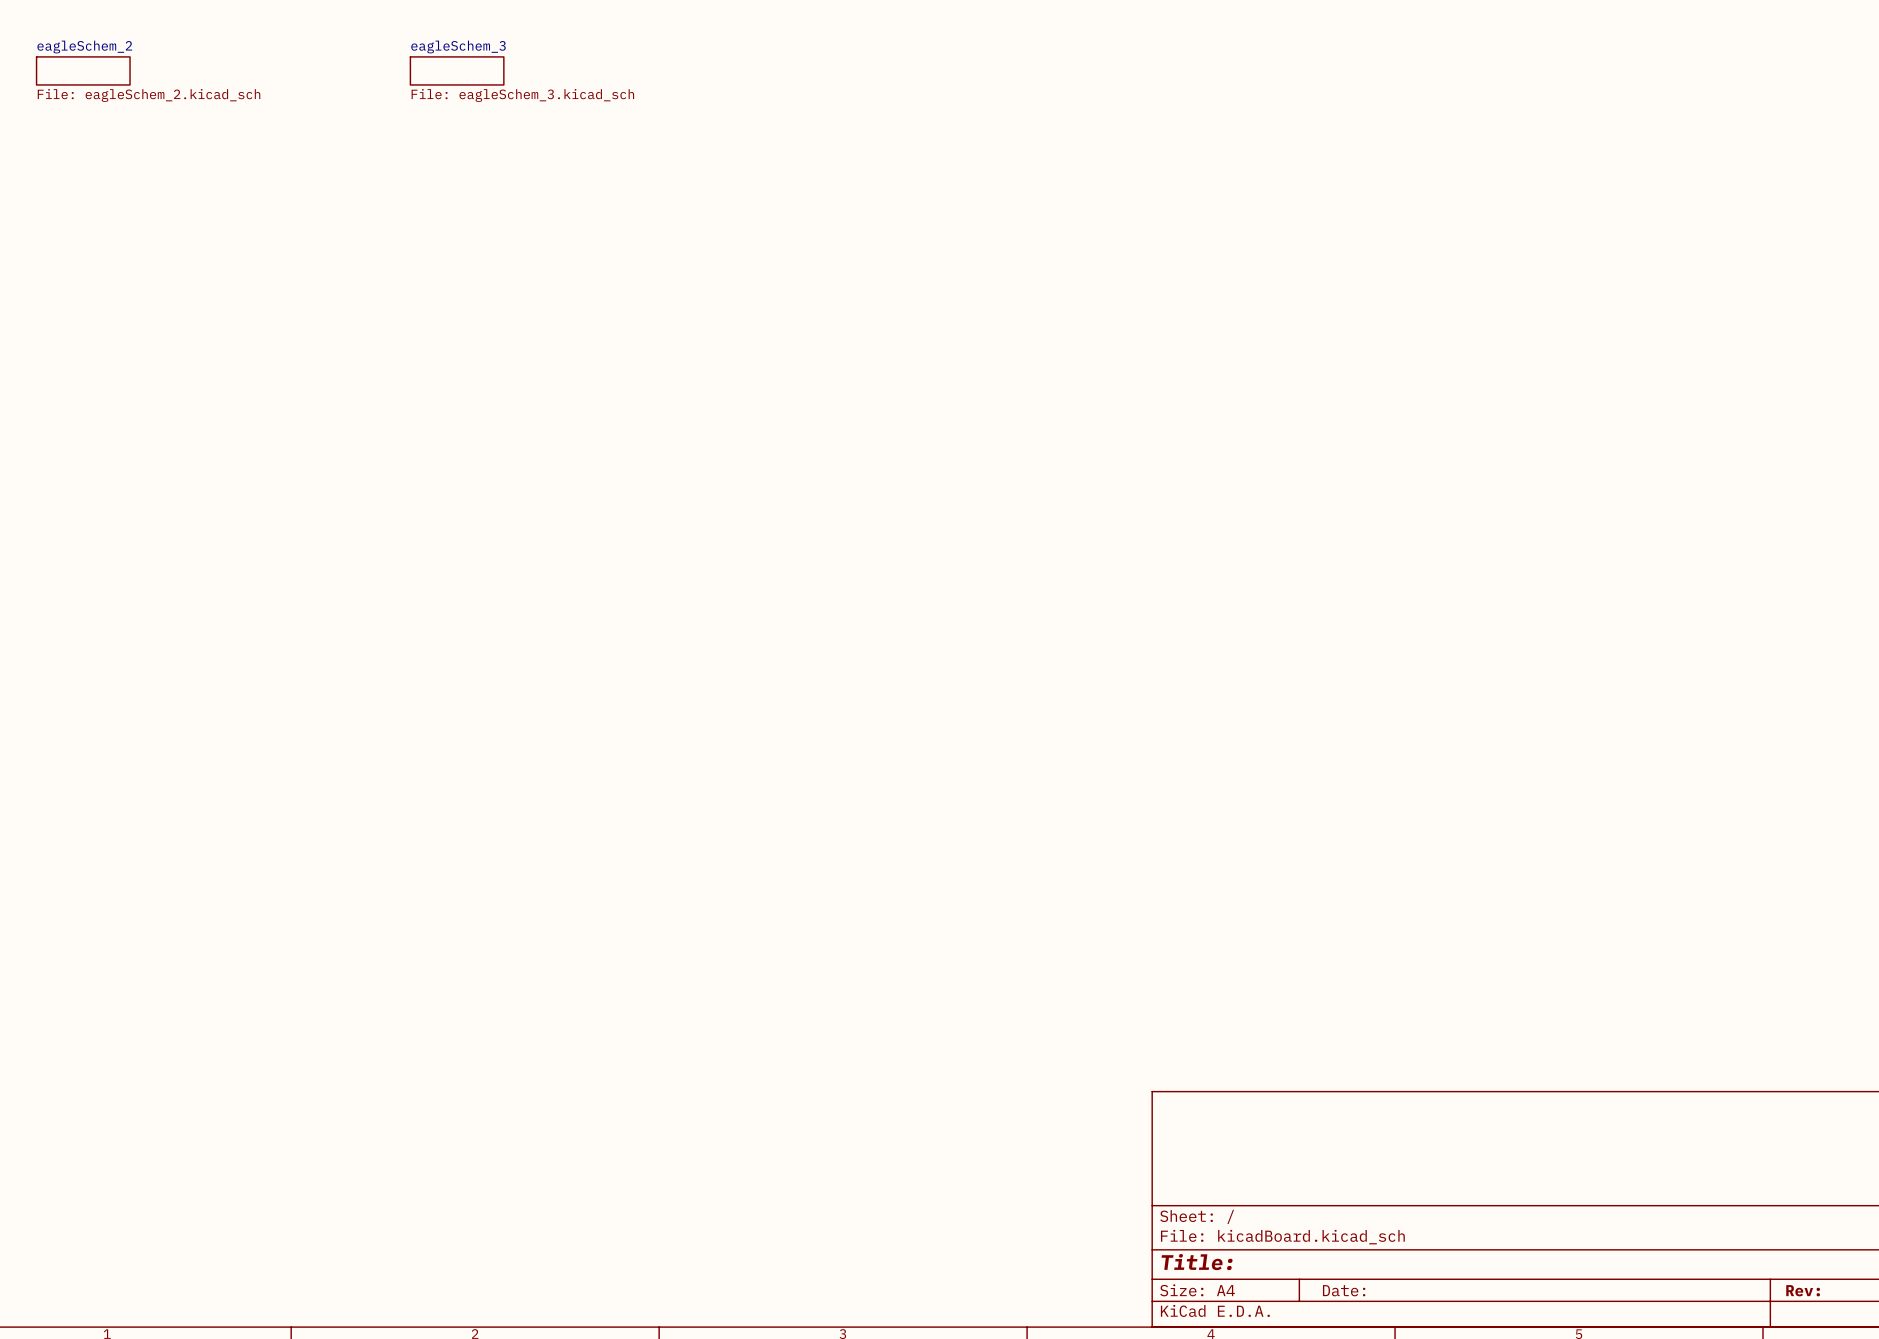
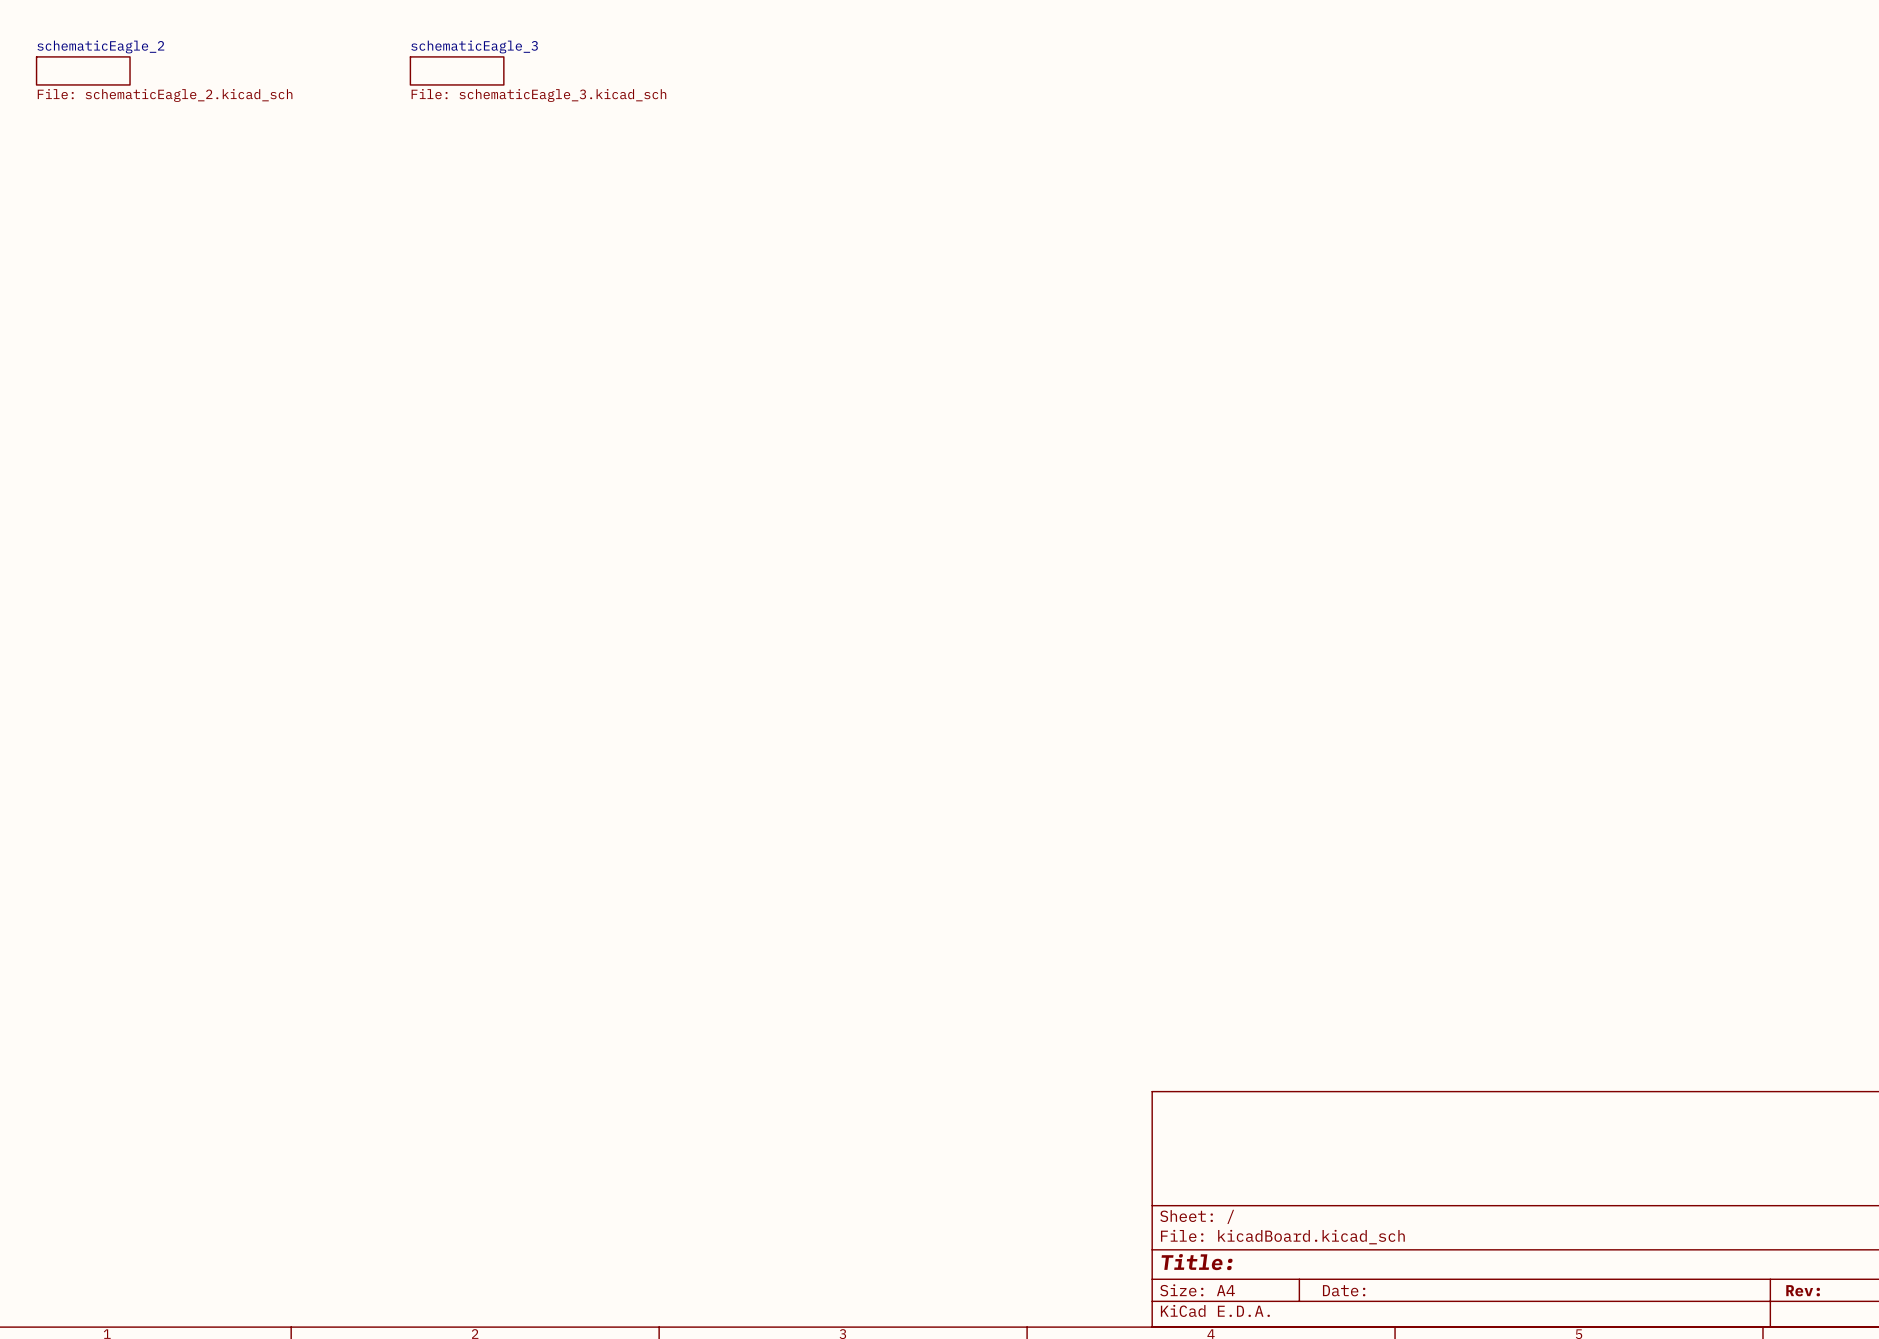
sheet eagleSchem_2 name: eagleSchem_2 (84, 47) -> schematicEagle_2 (100, 46)
sheet eagleSchem_3 name: eagleSchem_3 (458, 47) -> schematicEagle_3 (474, 46)
sheet eagleSchem_2 value: File: eagleSchem_2.kicad_sch (149, 95) -> File: schematicEagle_2.kicad_sch (165, 95)
sheet eagleSchem_3 value: File: eagleSchem_3.kicad_sch (522, 95) -> File: schematicEagle_3.kicad_sch (538, 95)

